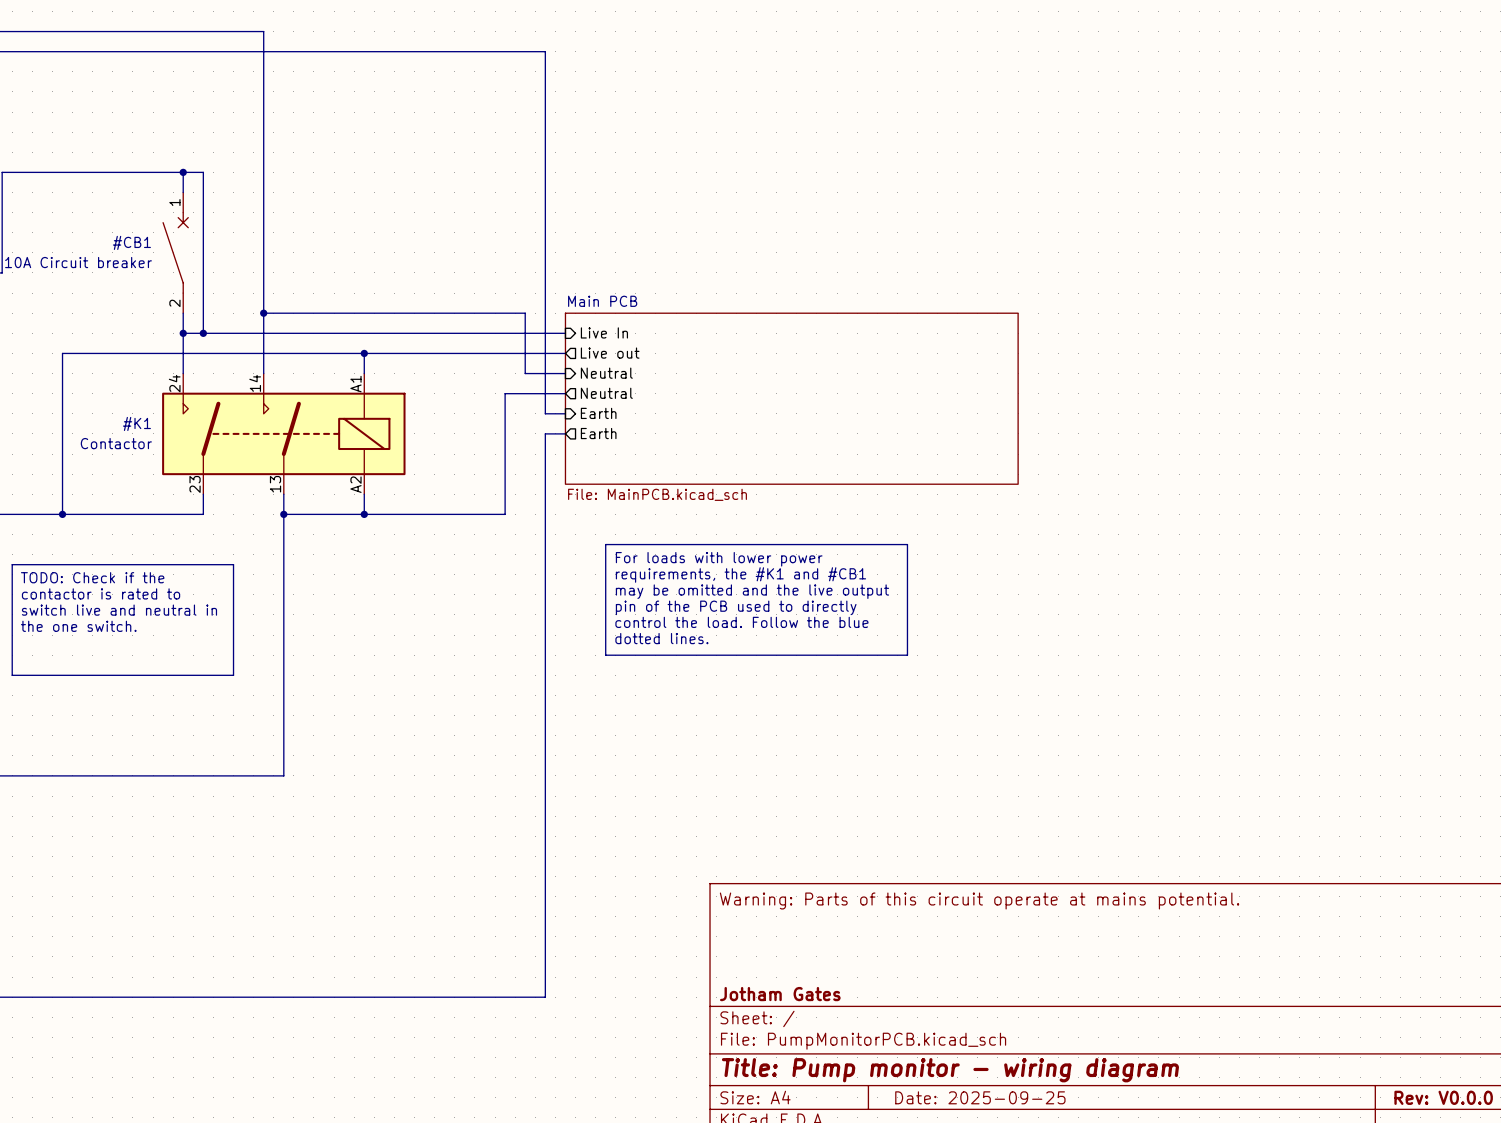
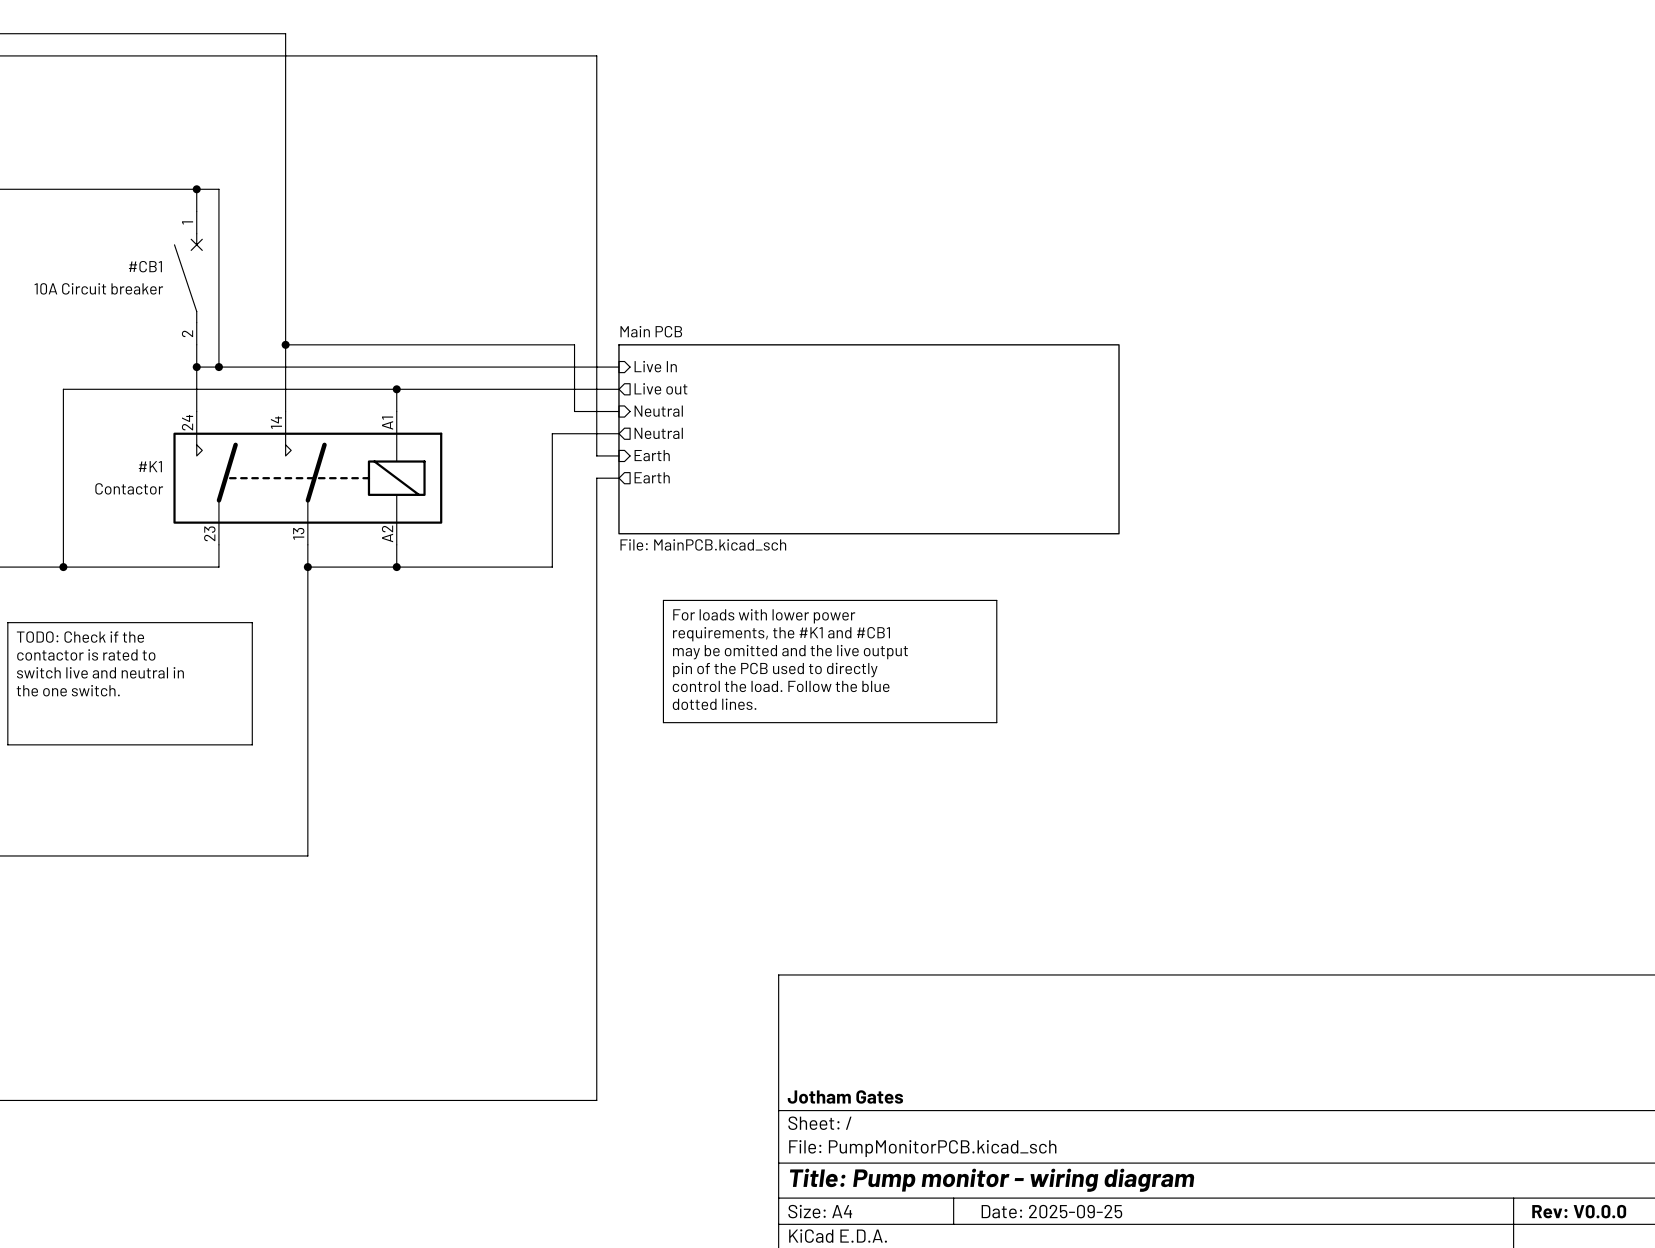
title block: Warning: Parts of this circuit operate at mains potential. (979, 901) -> none

